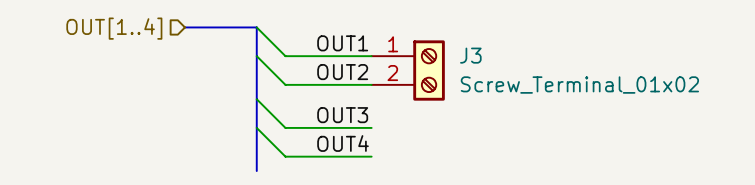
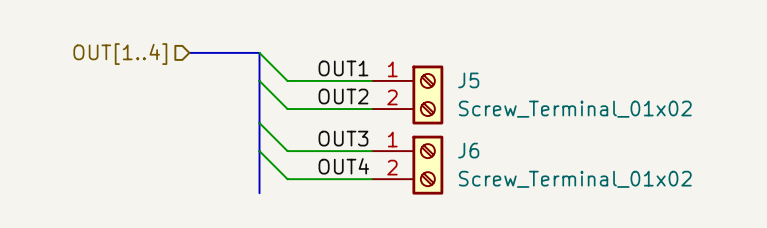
J3 name: J3 (470, 55) -> J5 (468, 80)
J6: none -> Screw_Terminal_01x02 (407, 165)

